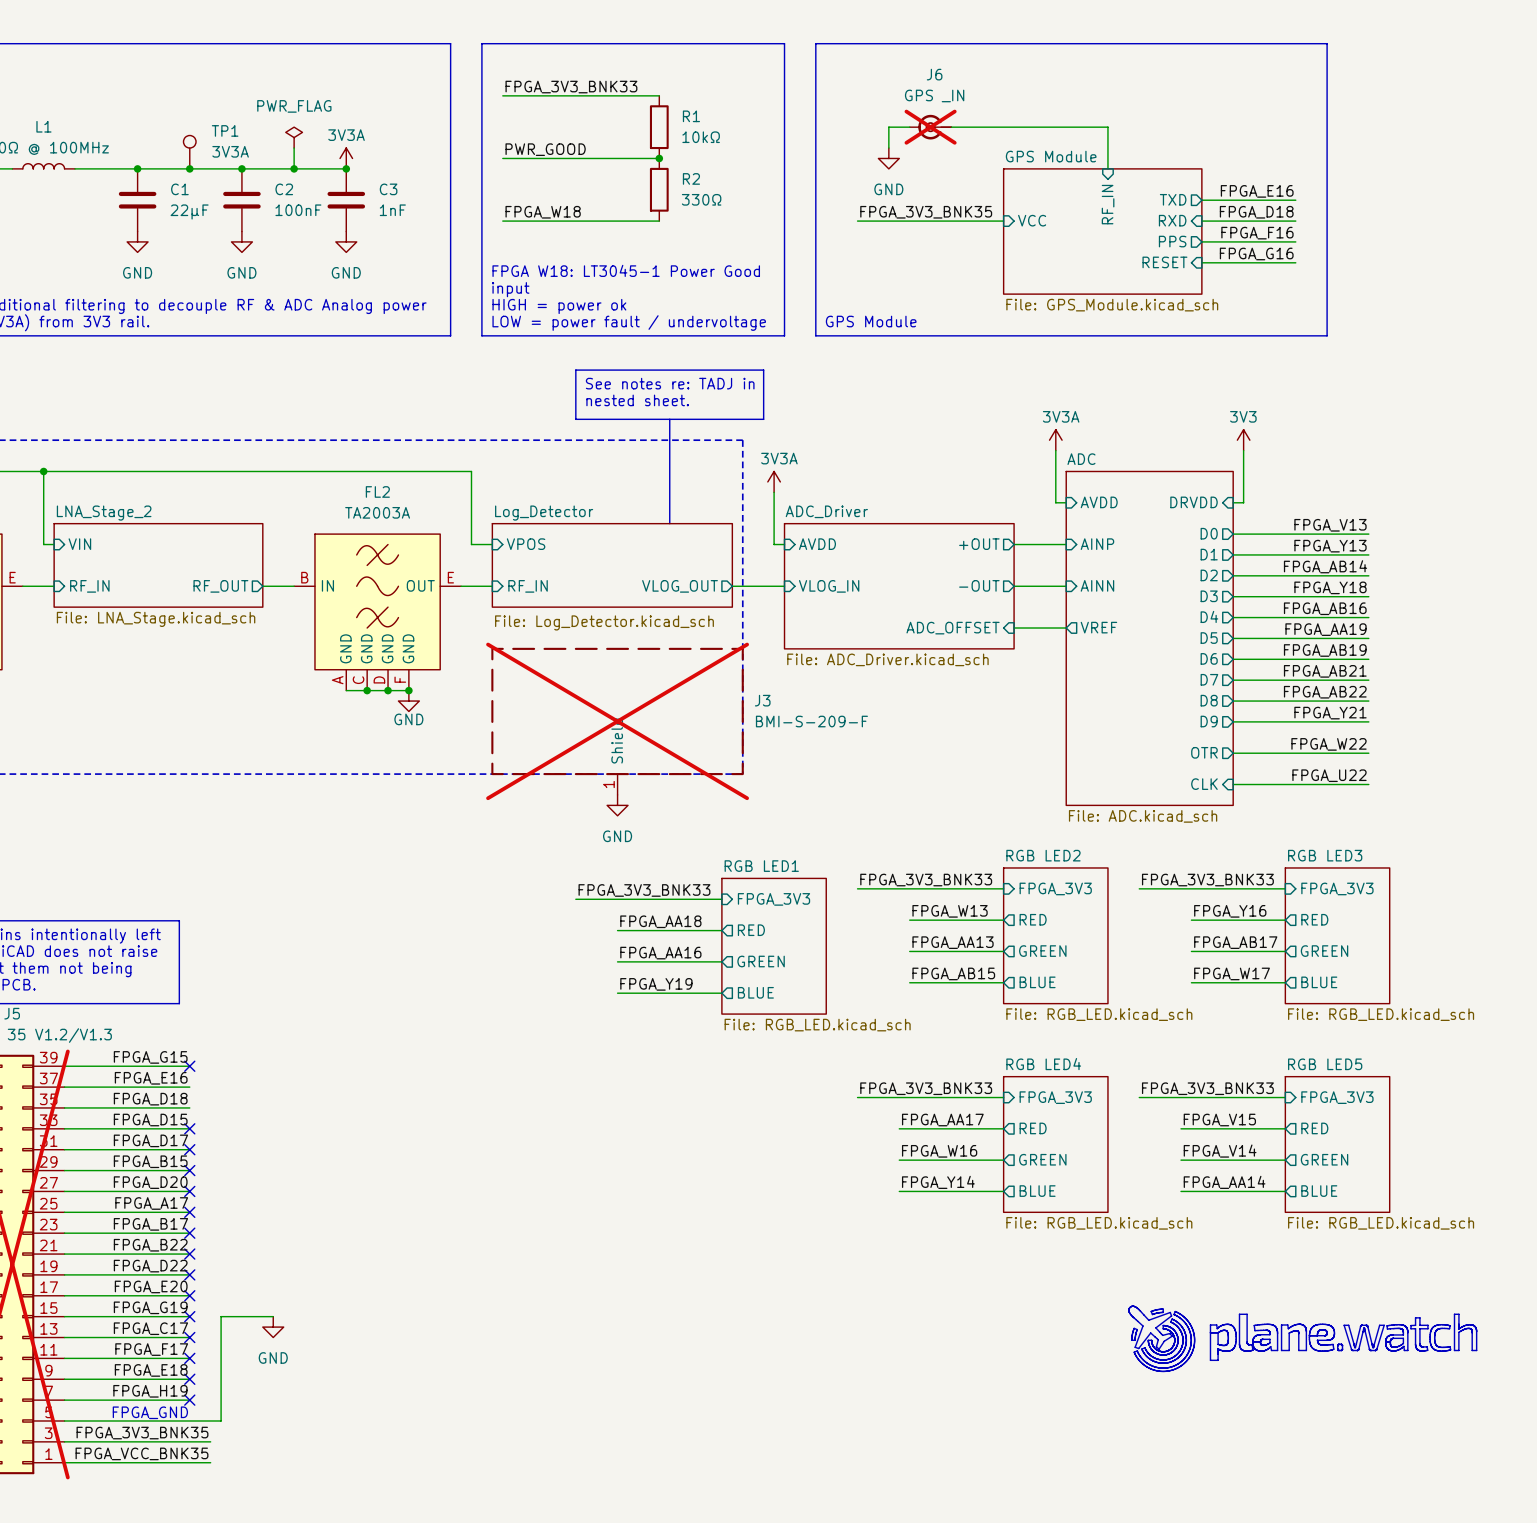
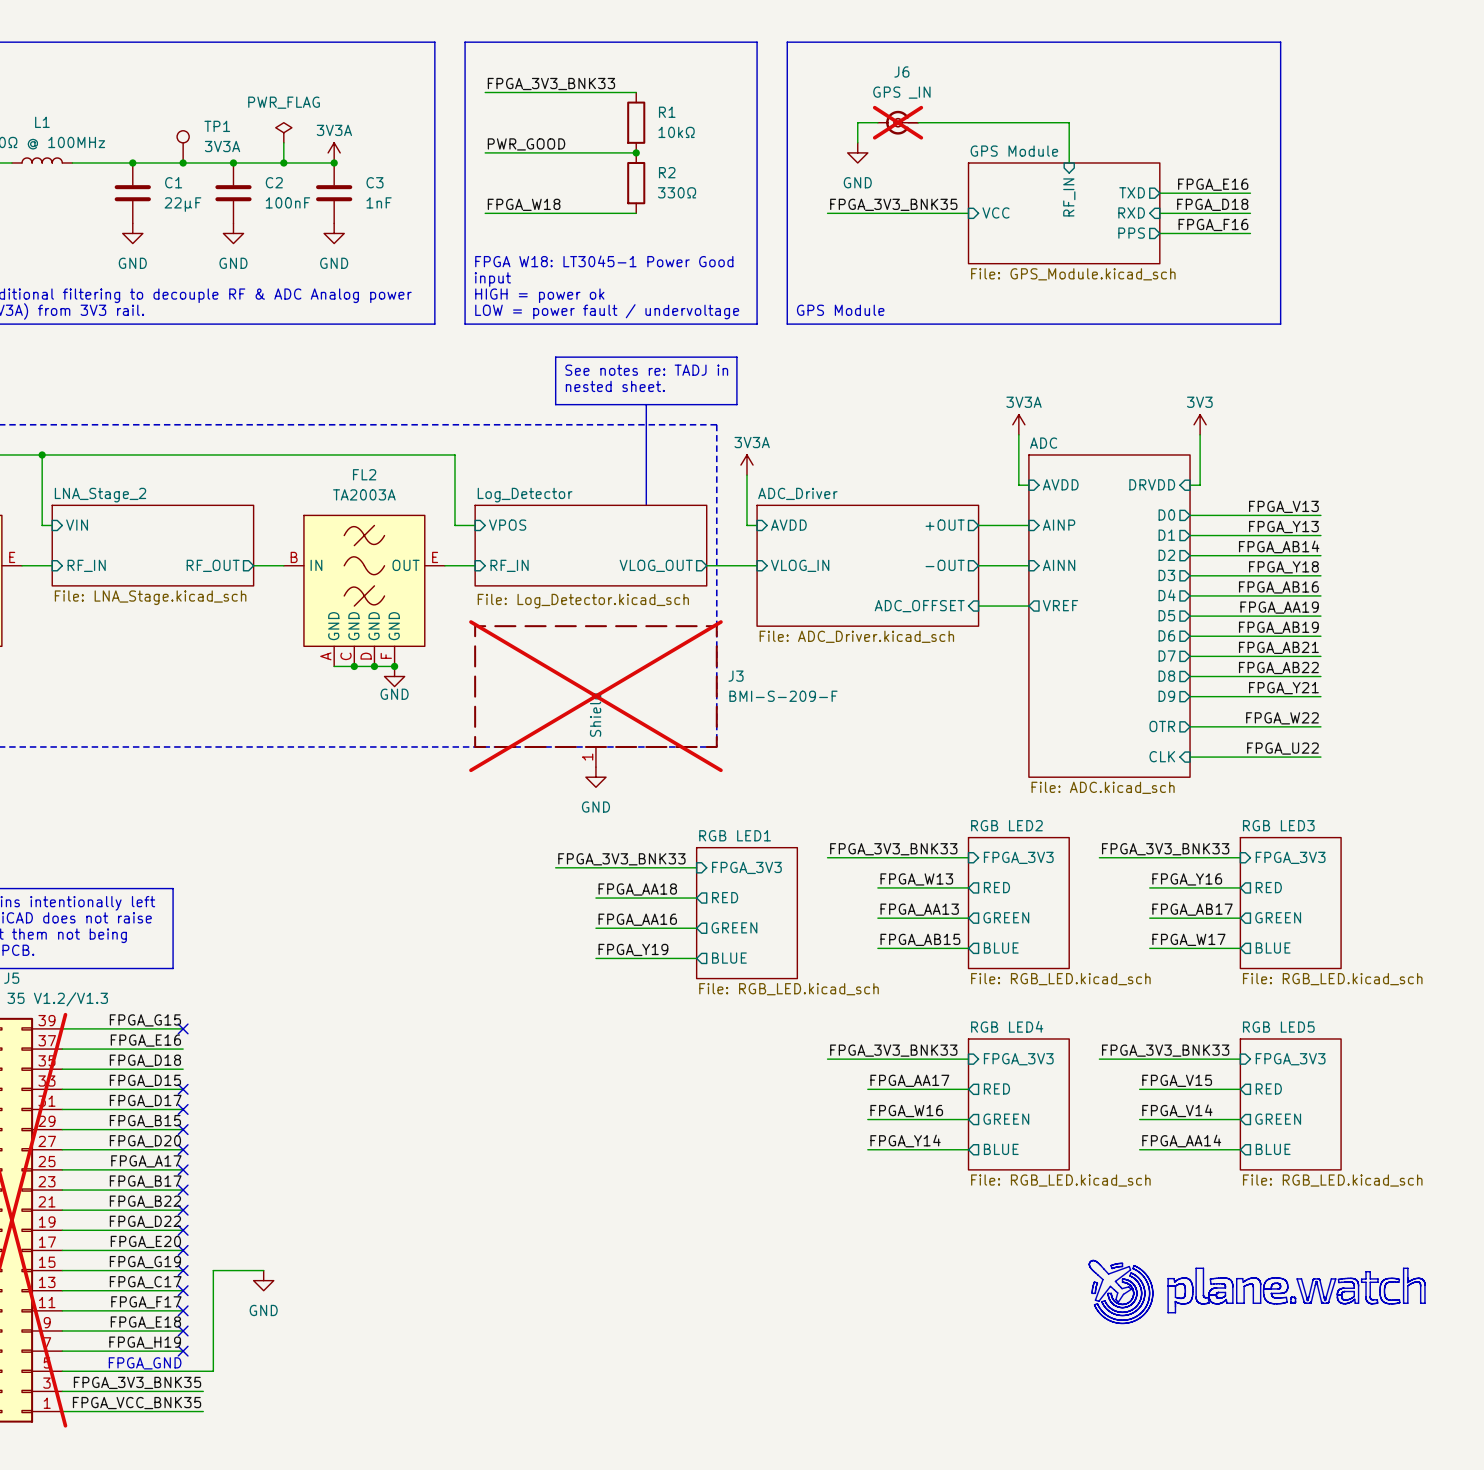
sheet GPS Module: none -> File: GPS_Module.kicad_sch (1064, 213)
sheet GPS Module: File: GPS_Module.kicad_sch (1102, 231) -> none
label: FPGA_G16 (1256, 253) -> none
sheet pin: RESET (1164, 262) -> none
wire: (1201, 262) (1295, 262) -> none

